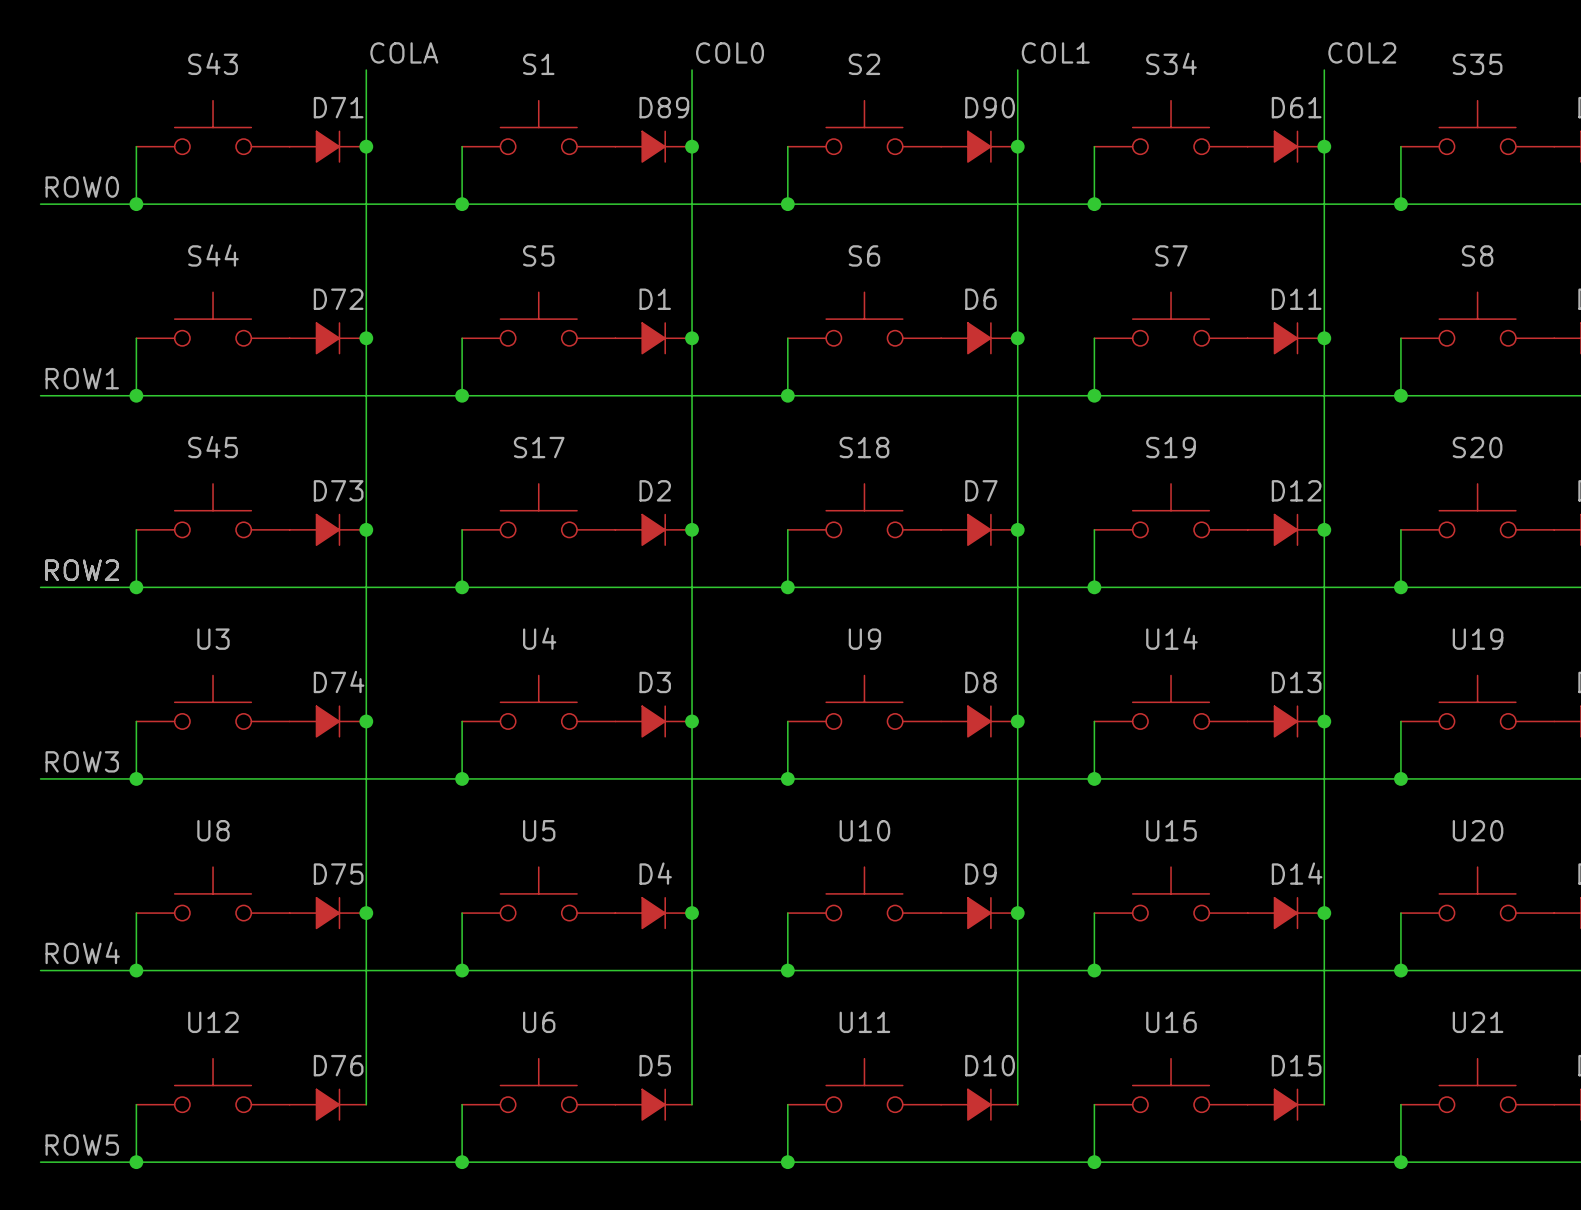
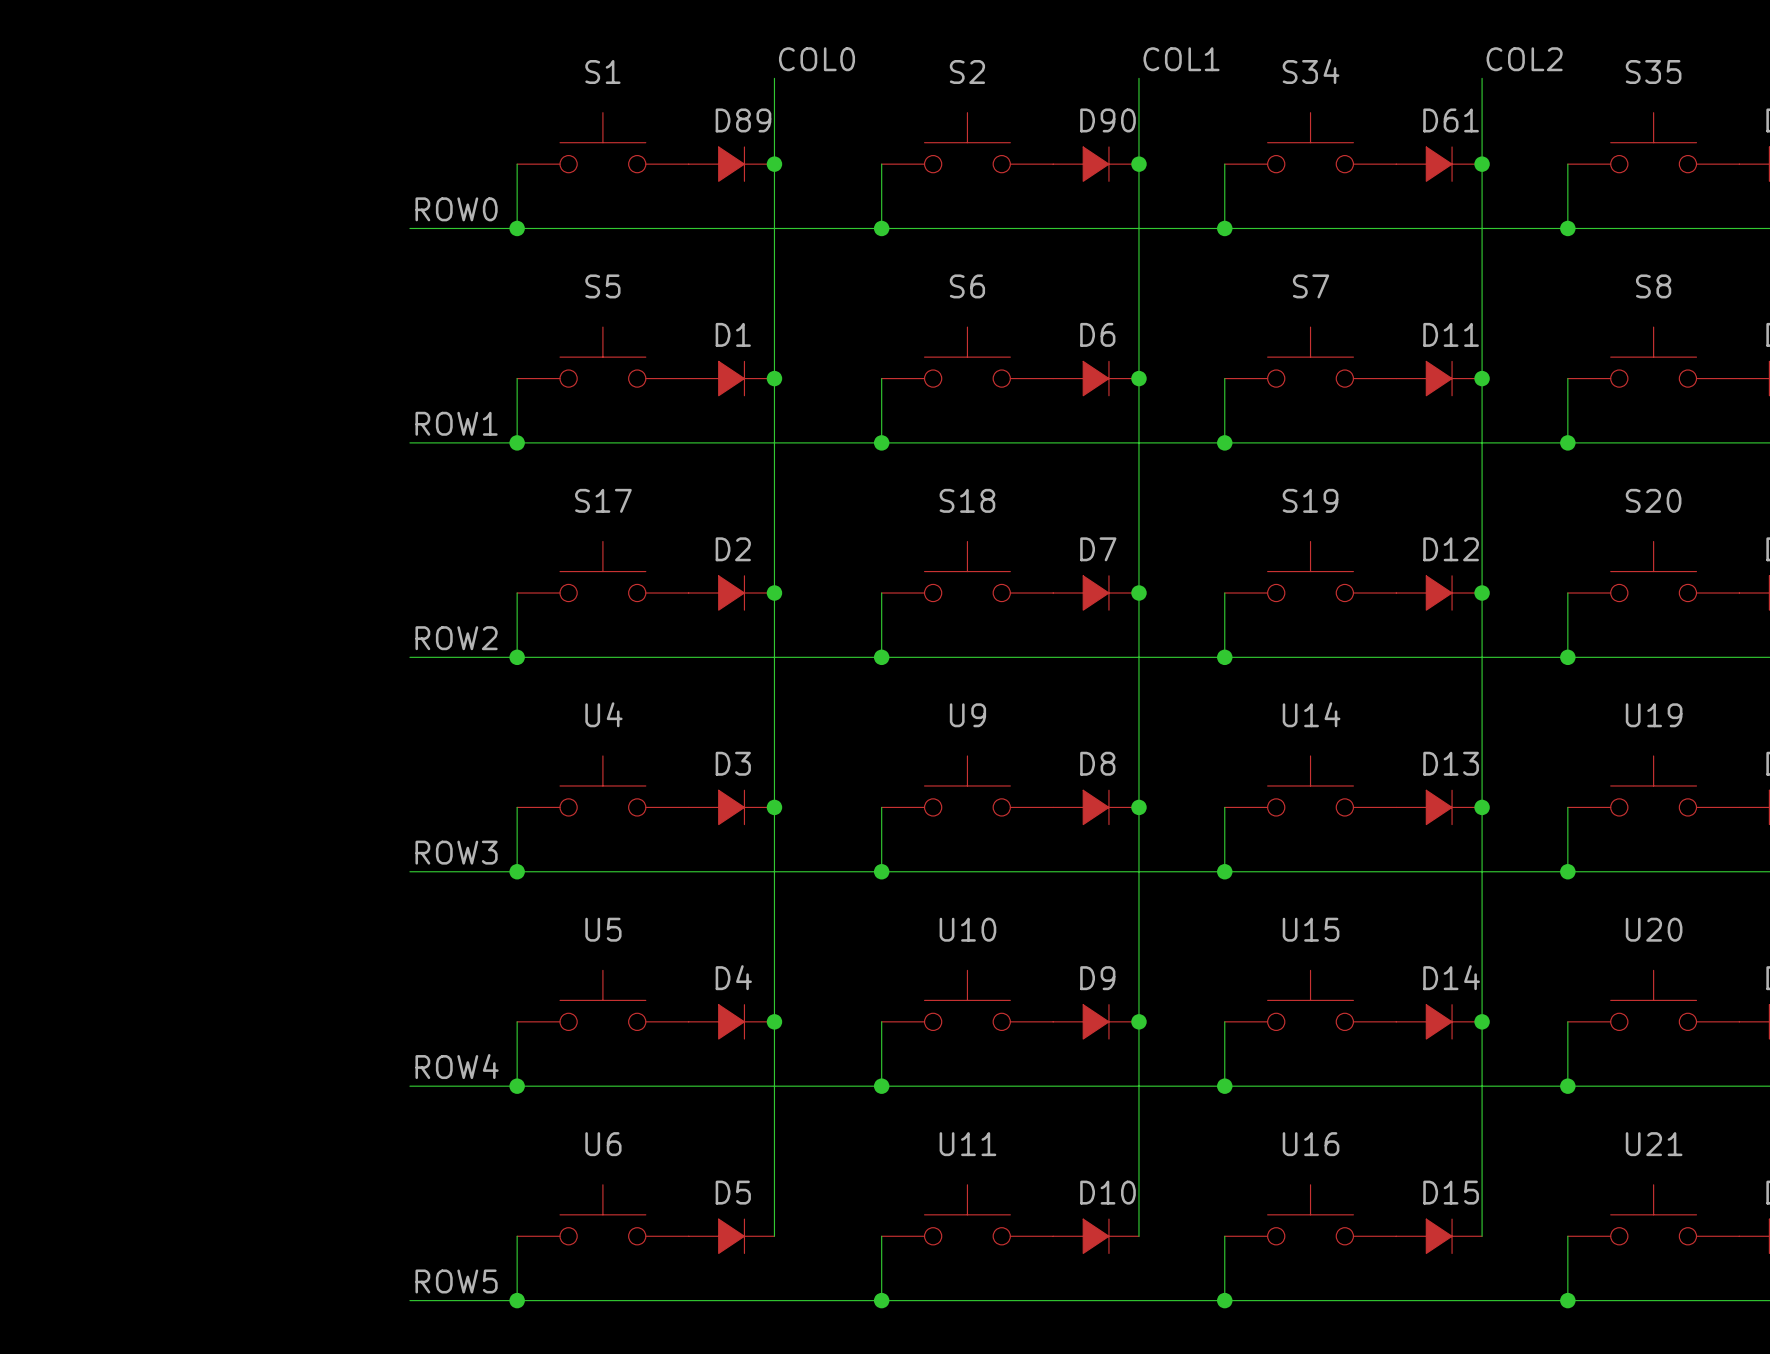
label: COLA (404, 52) -> none
wire: (366, 70) (366, 1104) -> none
S43: (213, 127) -> none
wire: (136, 146) (136, 204) -> none
D71: (327, 146) -> none
junction: (366, 146) -> none
label position: ROW0 (82, 187) -> ROW0 (456, 209)
wire: (40, 204) (366, 204) -> none
junction: (136, 204) -> none
S44: (213, 319) -> none
wire: (136, 338) (136, 395) -> none
D72: (327, 338) -> none
junction: (366, 338) -> none
label position: ROW1 (82, 378) -> ROW1 (456, 423)
wire: (40, 395) (366, 395) -> none
junction: (136, 395) -> none
S45: (213, 510) -> none
wire: (136, 529) (136, 587) -> none
D73: (327, 529) -> none
junction: (366, 529) -> none
label position: ROW2 (82, 570) -> ROW2 (456, 638)
wire: (40, 587) (366, 587) -> none
junction: (136, 587) -> none
U3: (213, 702) -> none
wire: (136, 721) (136, 778) -> none
D74: (327, 721) -> none
junction: (366, 721) -> none
label position: ROW3 (82, 761) -> ROW3 (456, 852)
wire: (40, 778) (366, 778) -> none
junction: (136, 778) -> none
U8: (213, 893) -> none
wire: (136, 913) (136, 970) -> none
D75: (327, 913) -> none
junction: (366, 913) -> none
label position: ROW4 (82, 953) -> ROW4 (457, 1066)
wire: (40, 970) (366, 970) -> none
junction: (136, 970) -> none
U12: (213, 1085) -> none
wire: (136, 1104) (136, 1162) -> none
D76: (327, 1104) -> none
label position: ROW5 (82, 1145) -> ROW5 (456, 1281)
wire: (40, 1162) (366, 1162) -> none
junction: (136, 1162) -> none

